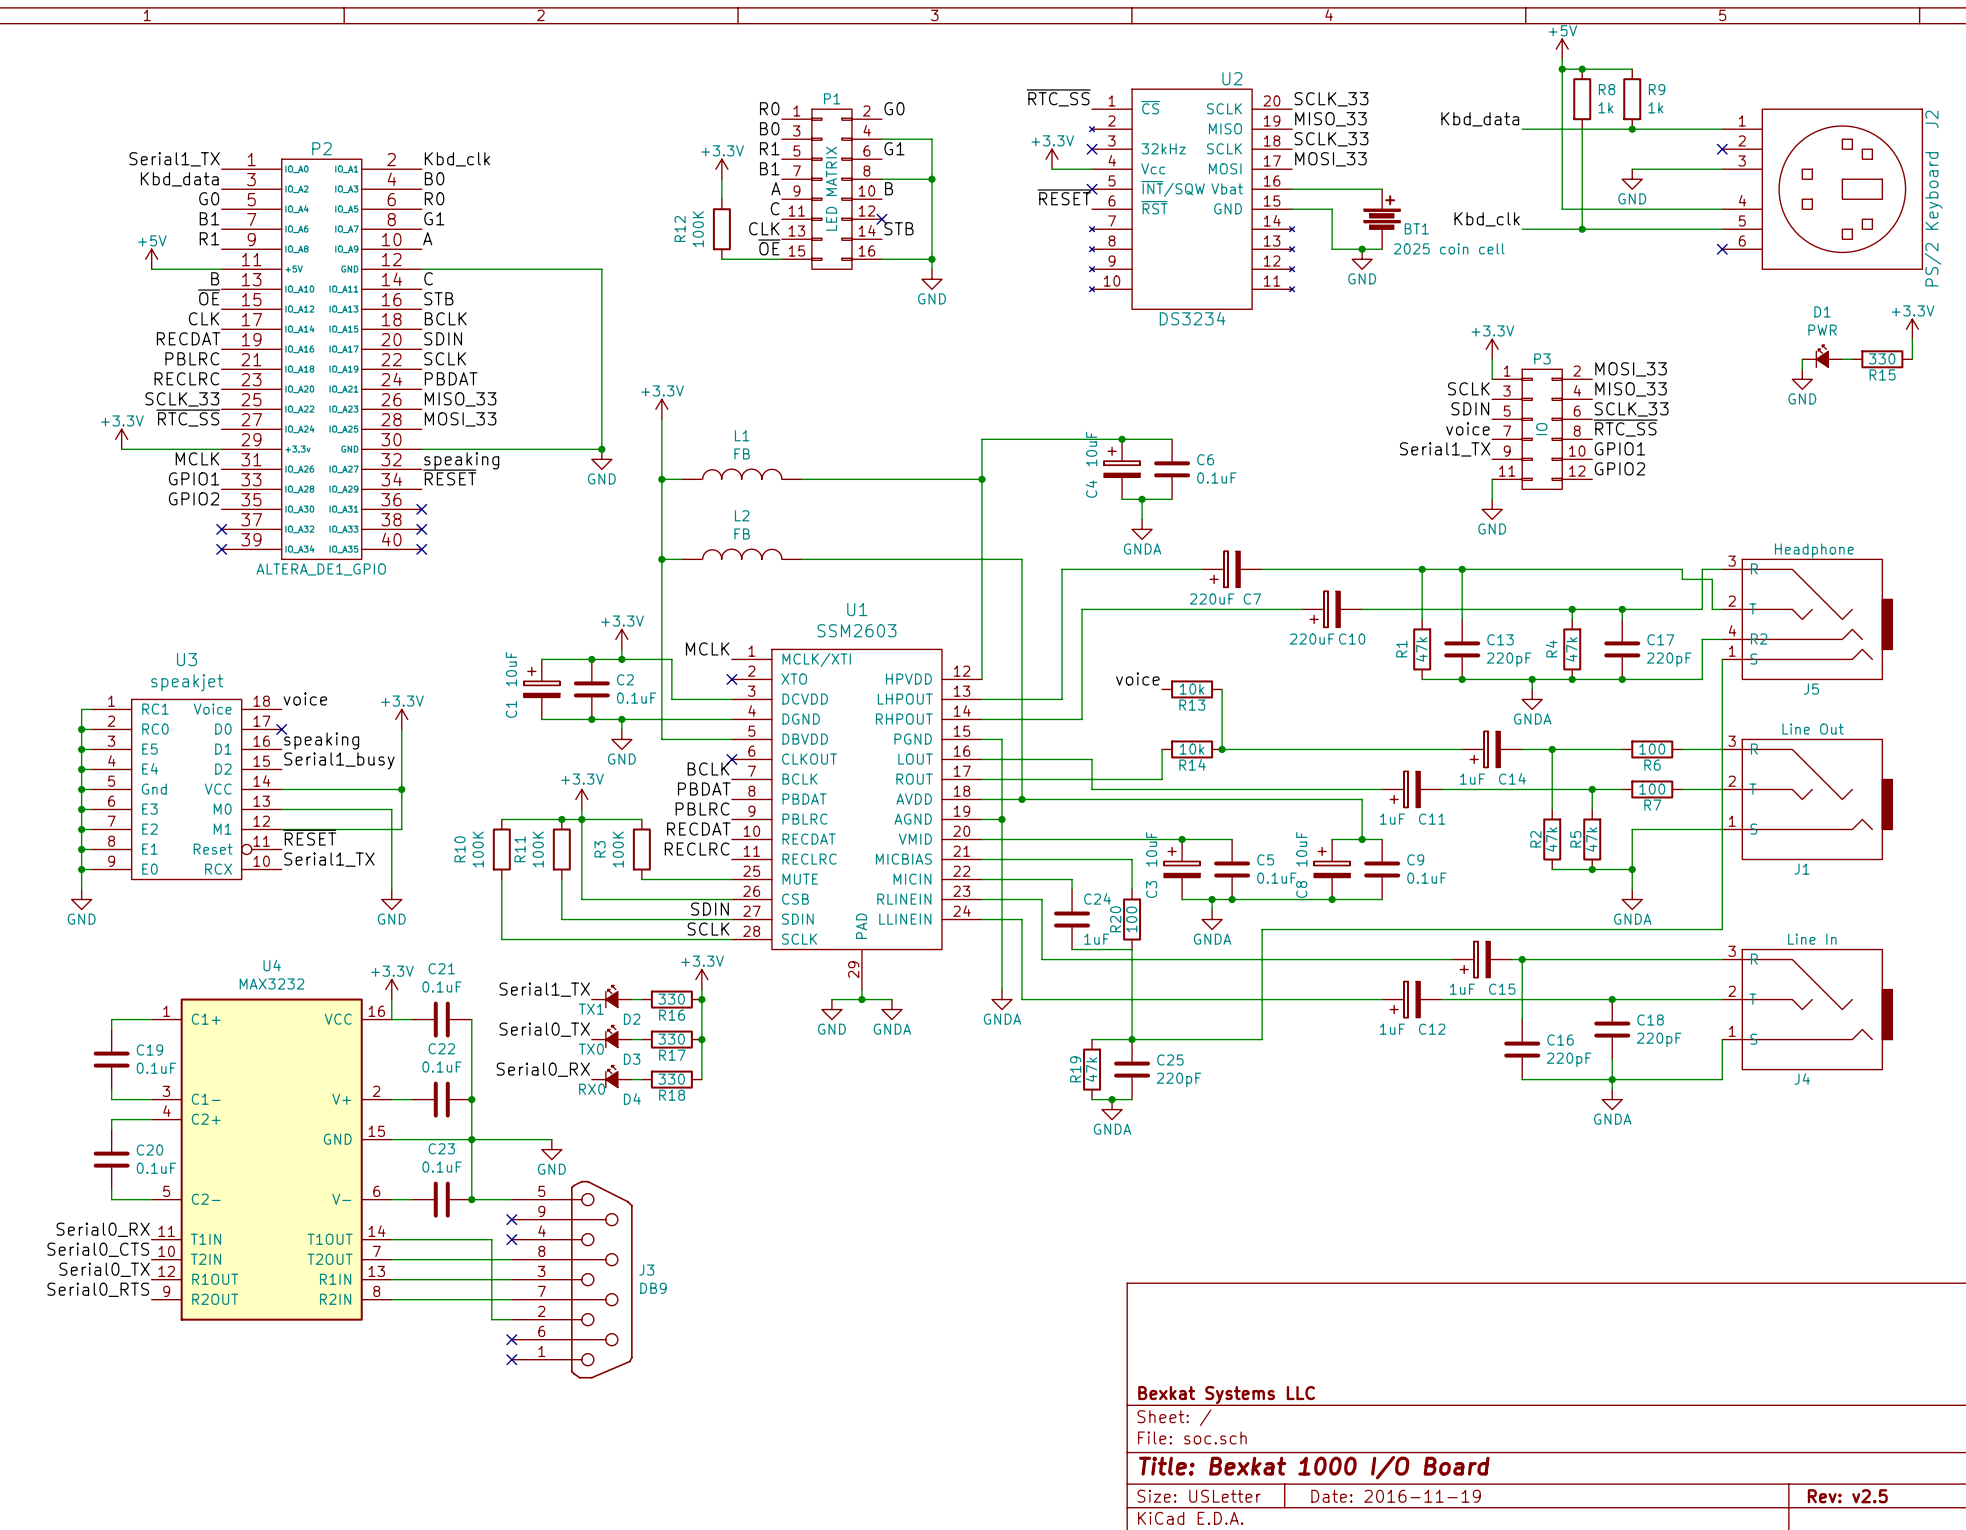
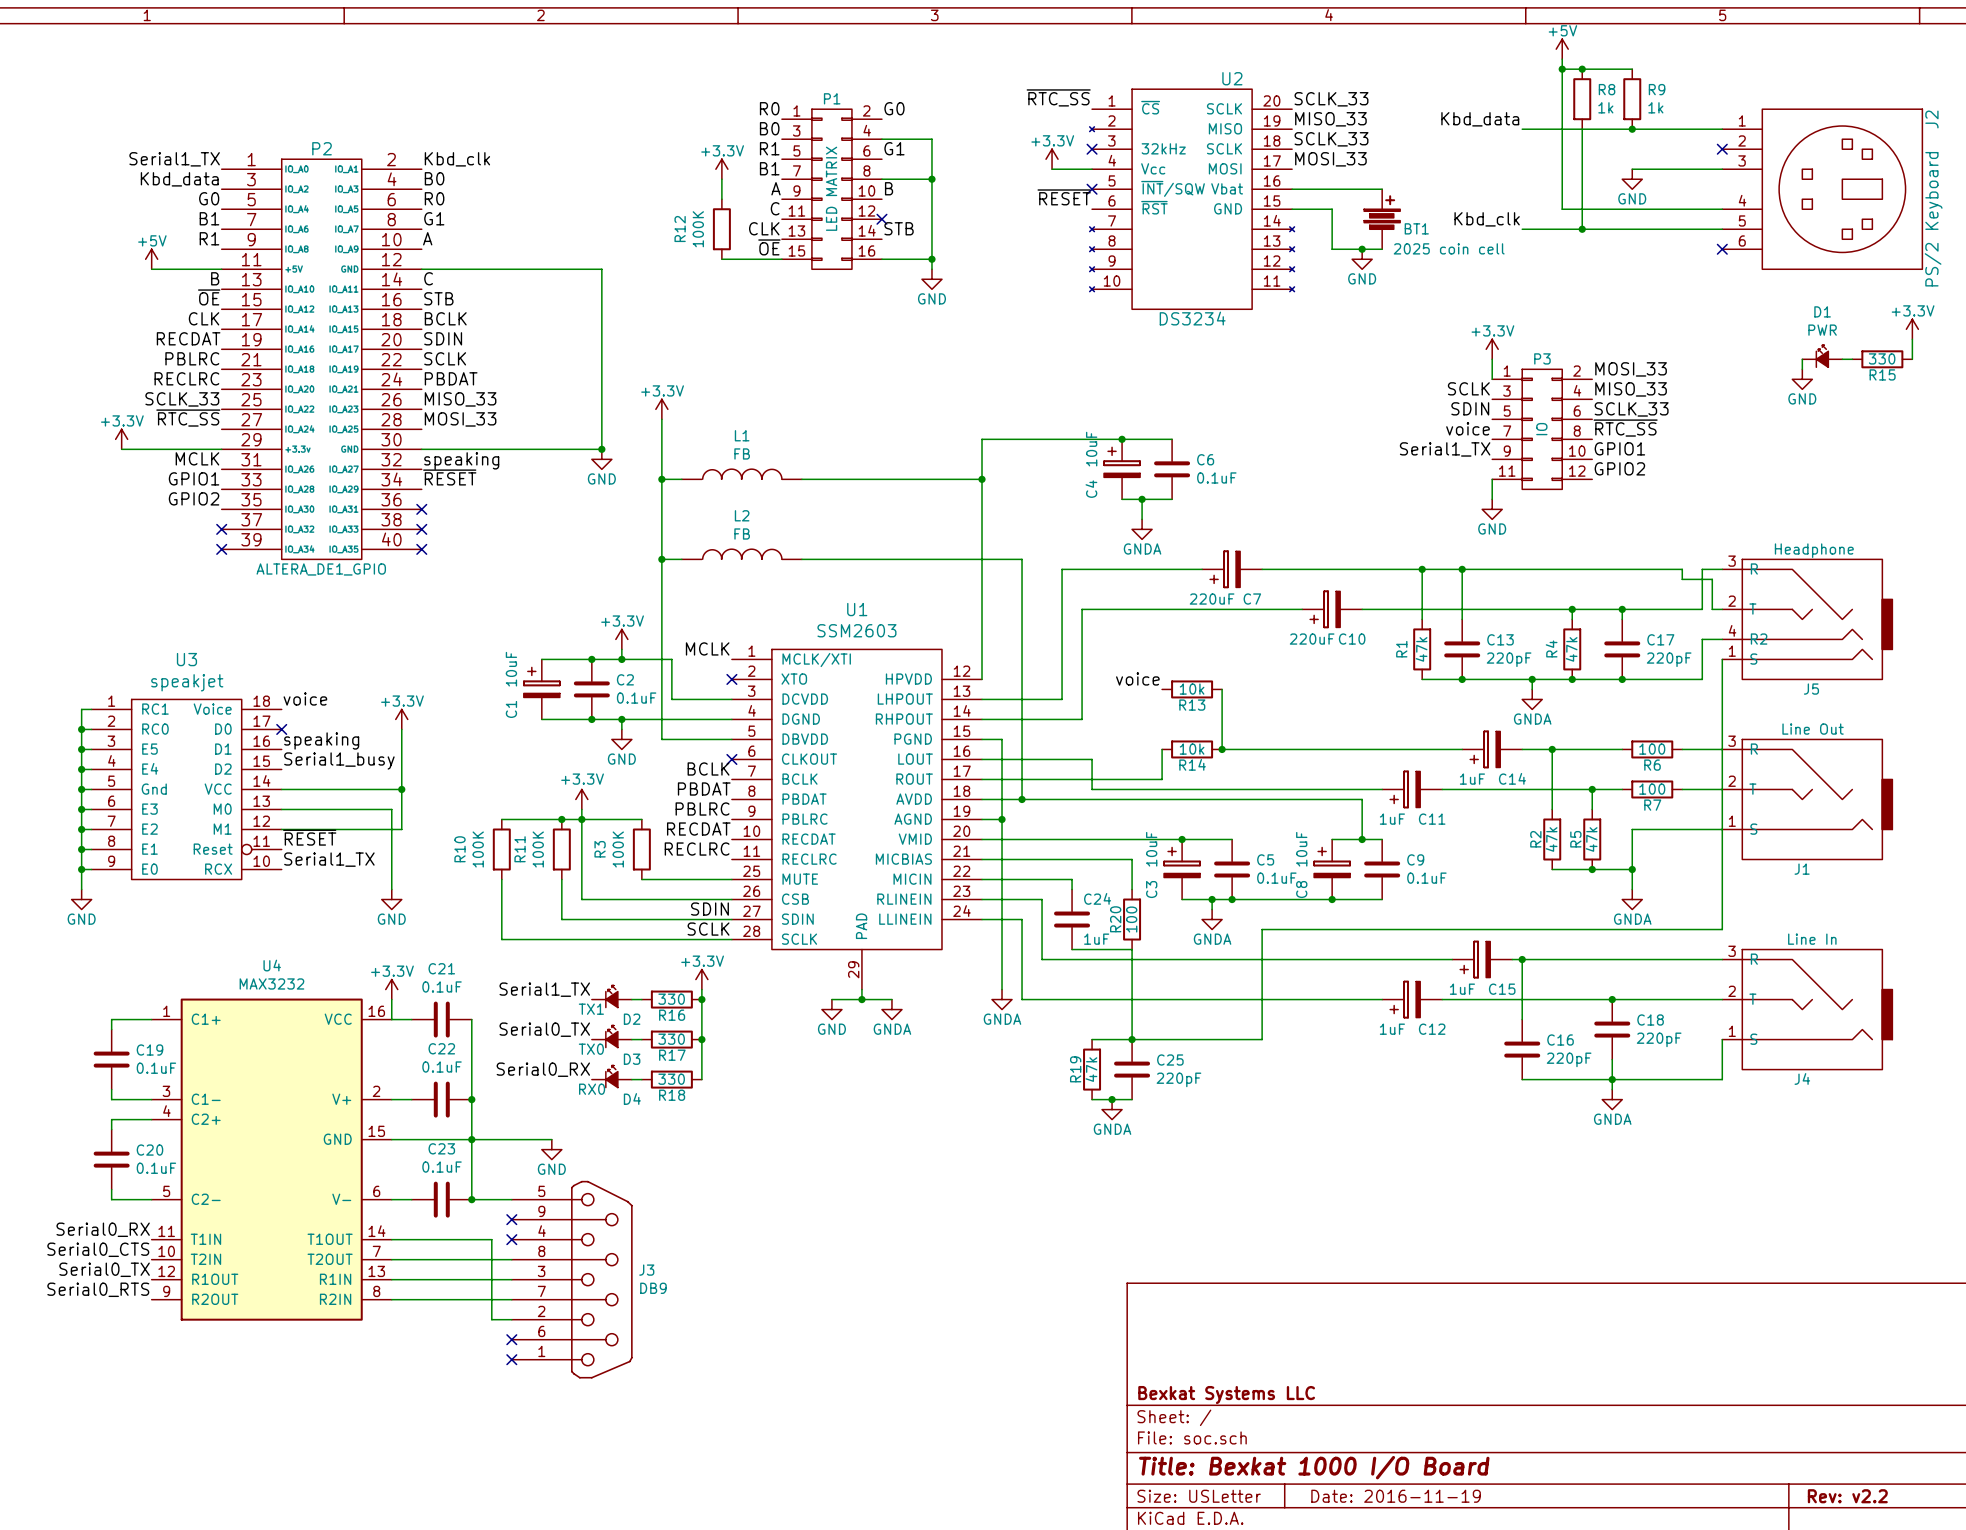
title block: Rev: v2.5 (1847, 1496) -> Rev: v2.2 (1847, 1496)

